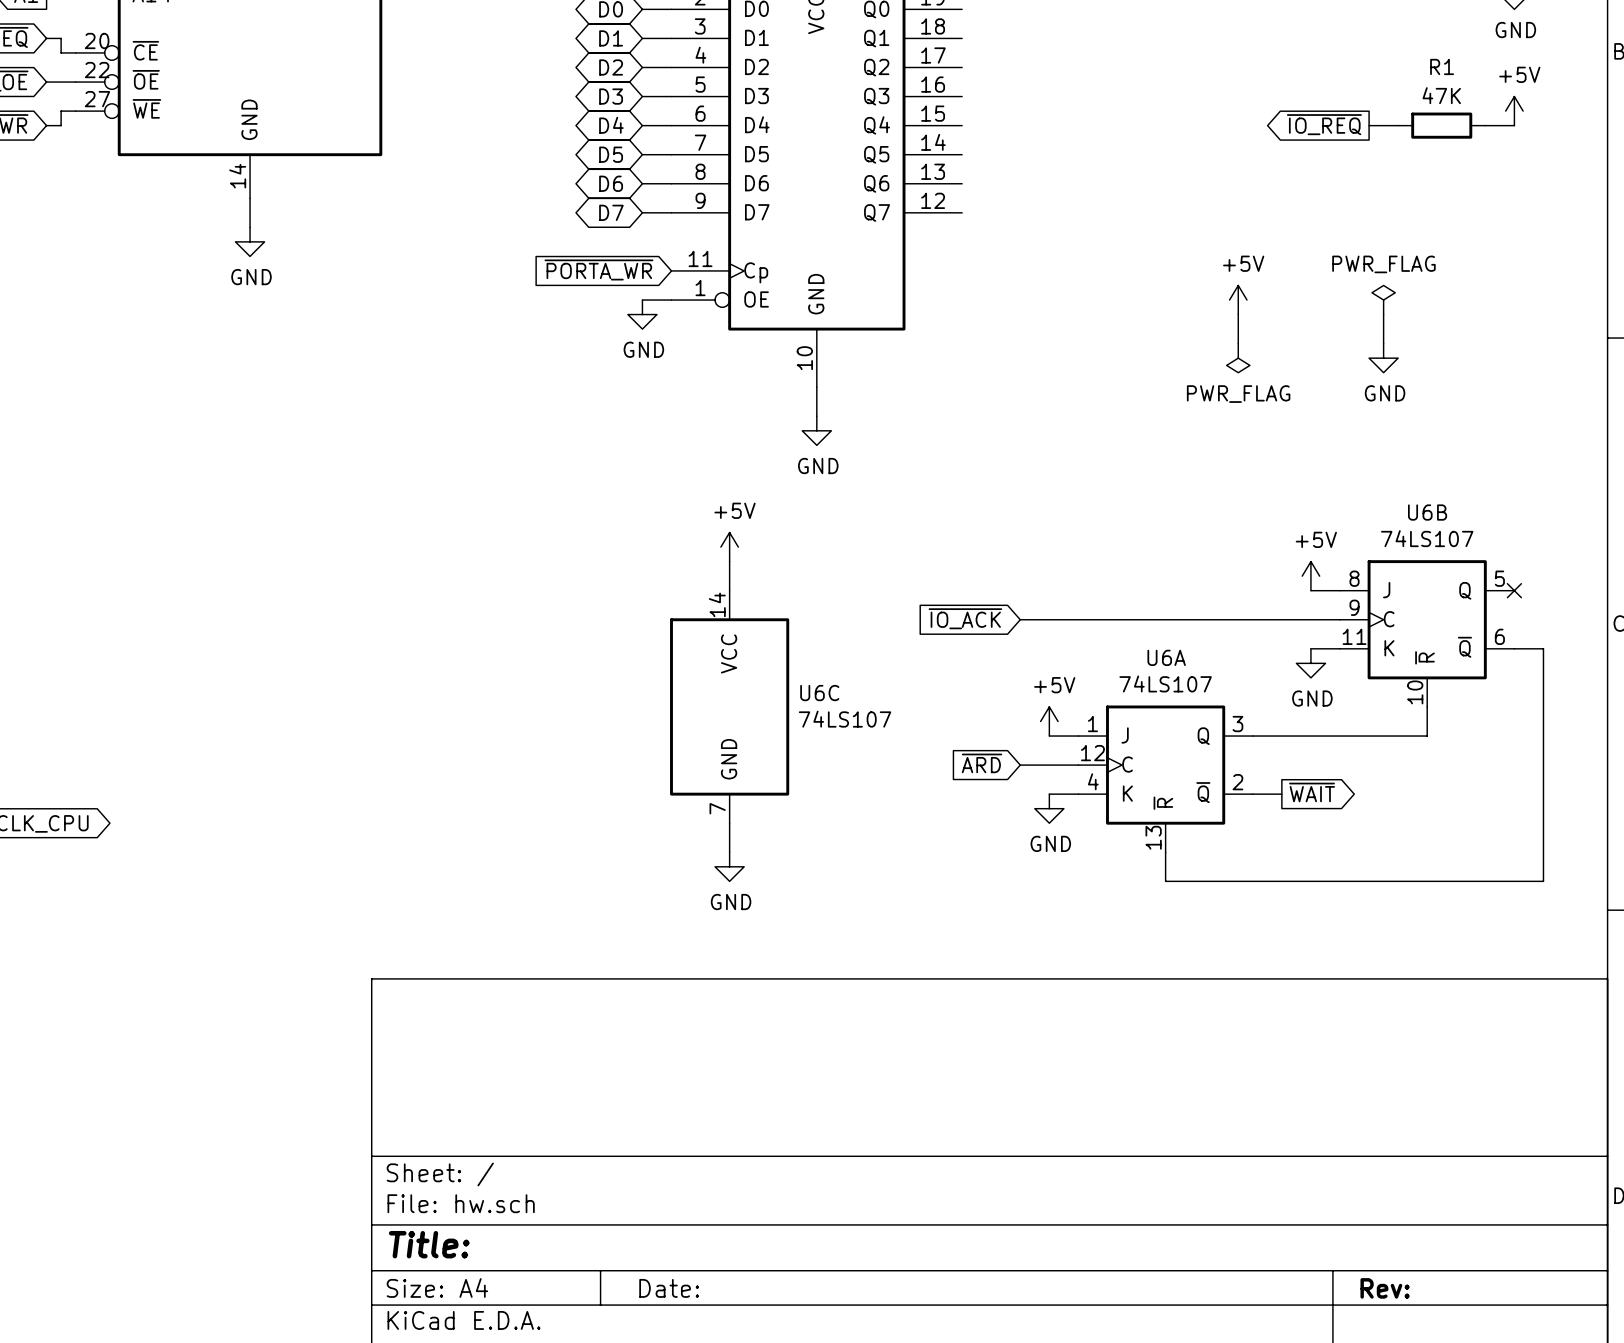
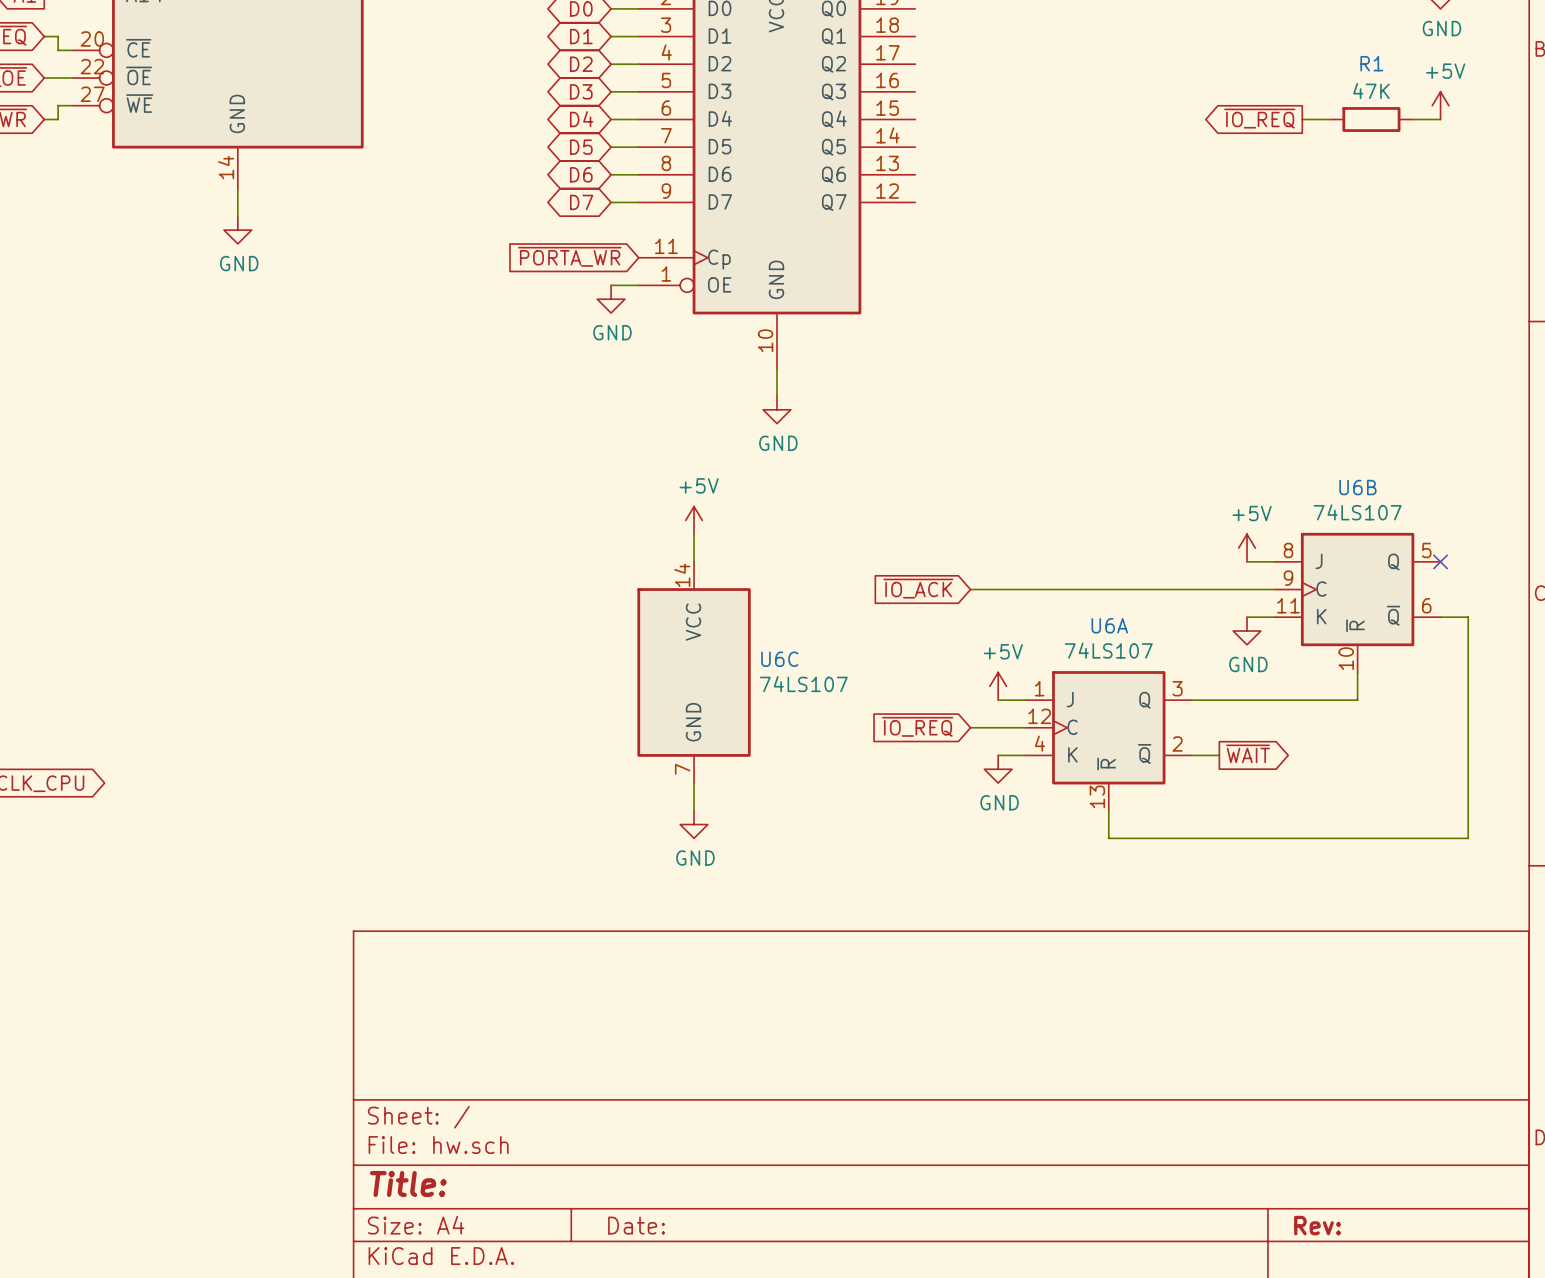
power symbol: +5V (1238, 300) -> none
power symbol: PWR_FLAG (1383, 300) -> none
wire: (1238, 314) (1238, 343) -> none
wire: (1383, 314) (1383, 343) -> none
power symbol: PWR_FLAG (1238, 358) -> none
power symbol: GND (1383, 358) -> none
global label: ~{ARD} (981, 763) -> ~{IO_REQ} (917, 726)

